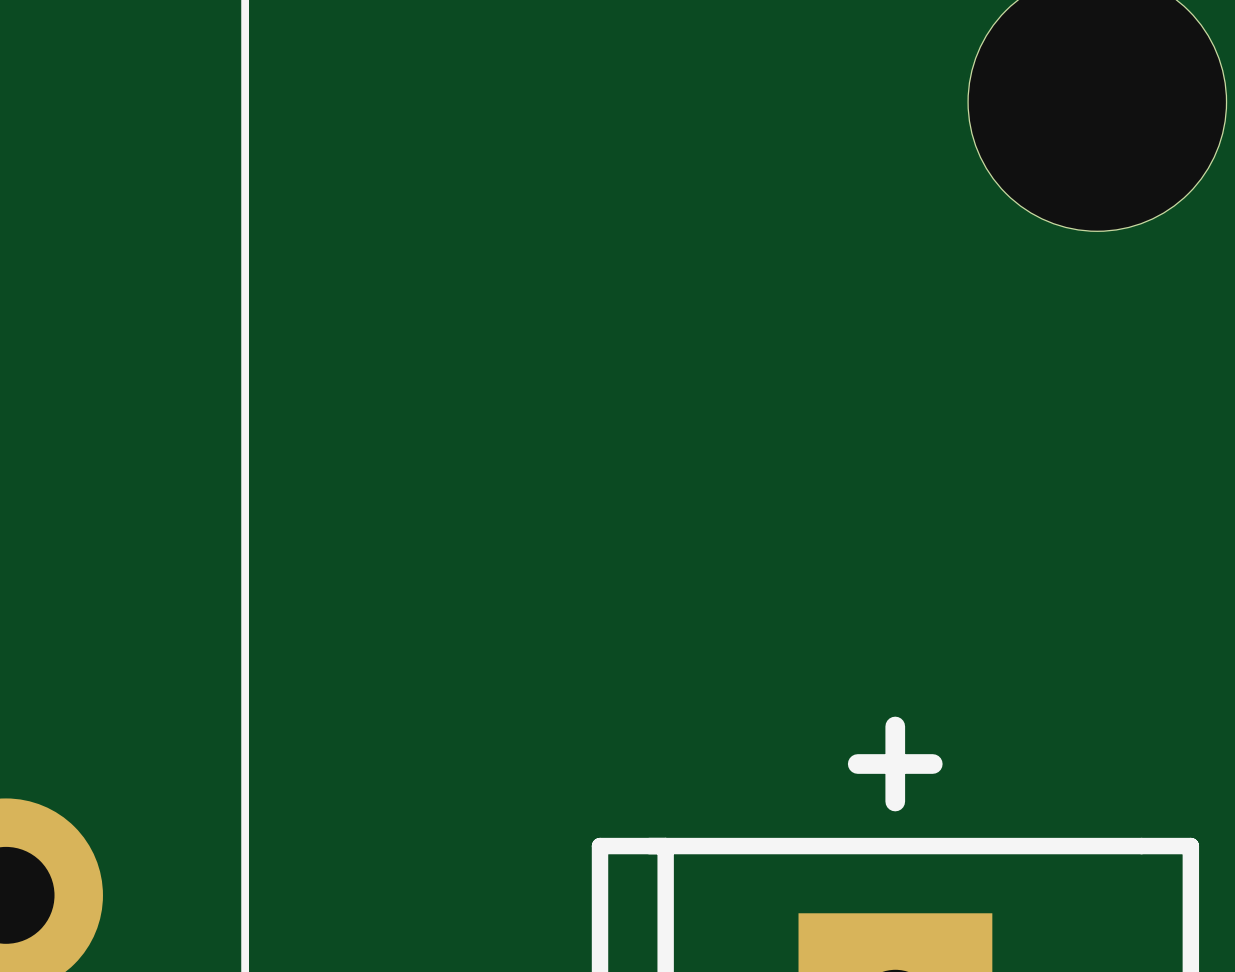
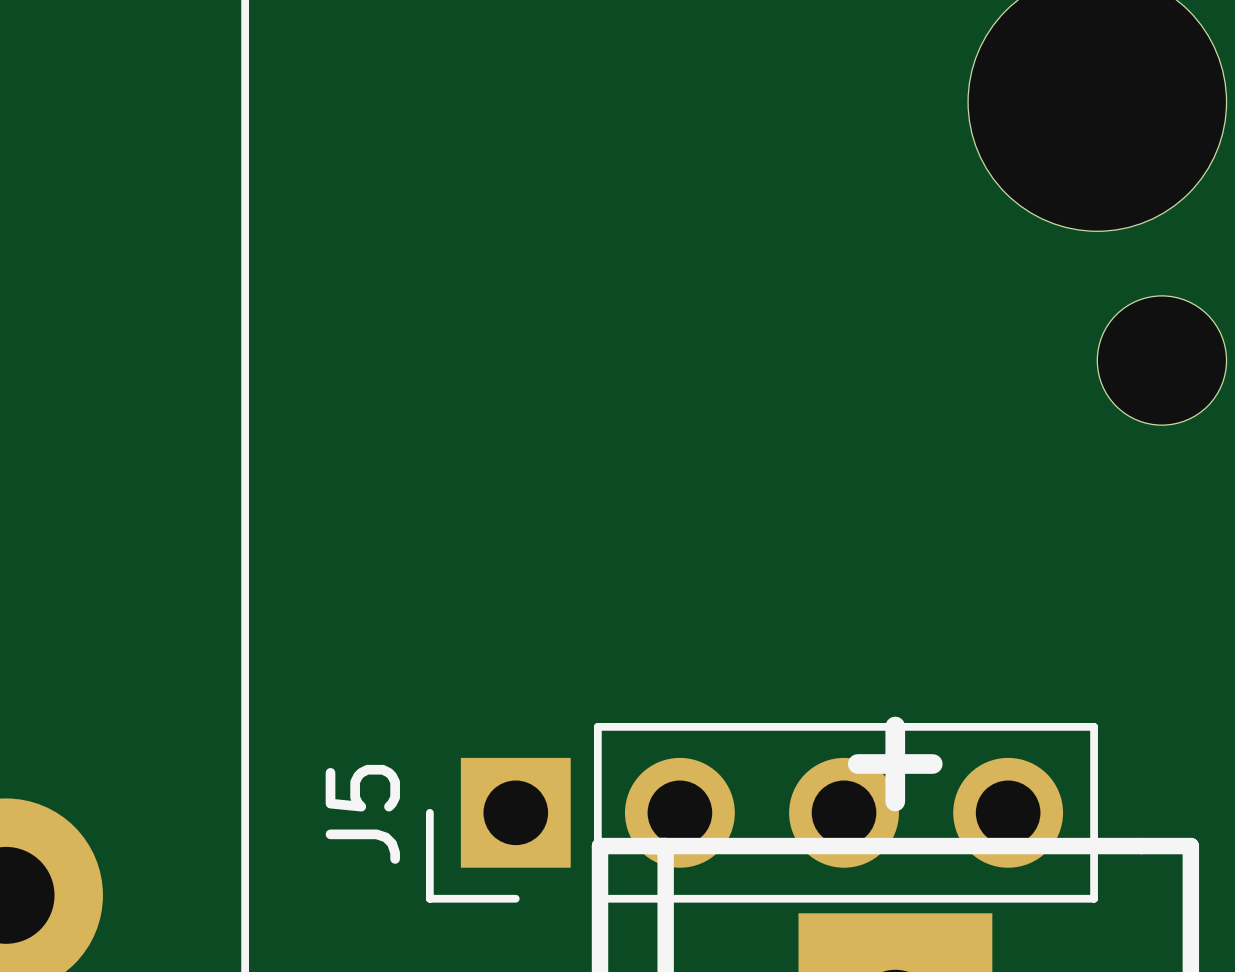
part: none -> (1161, 360)
J5: none -> (761, 812)

